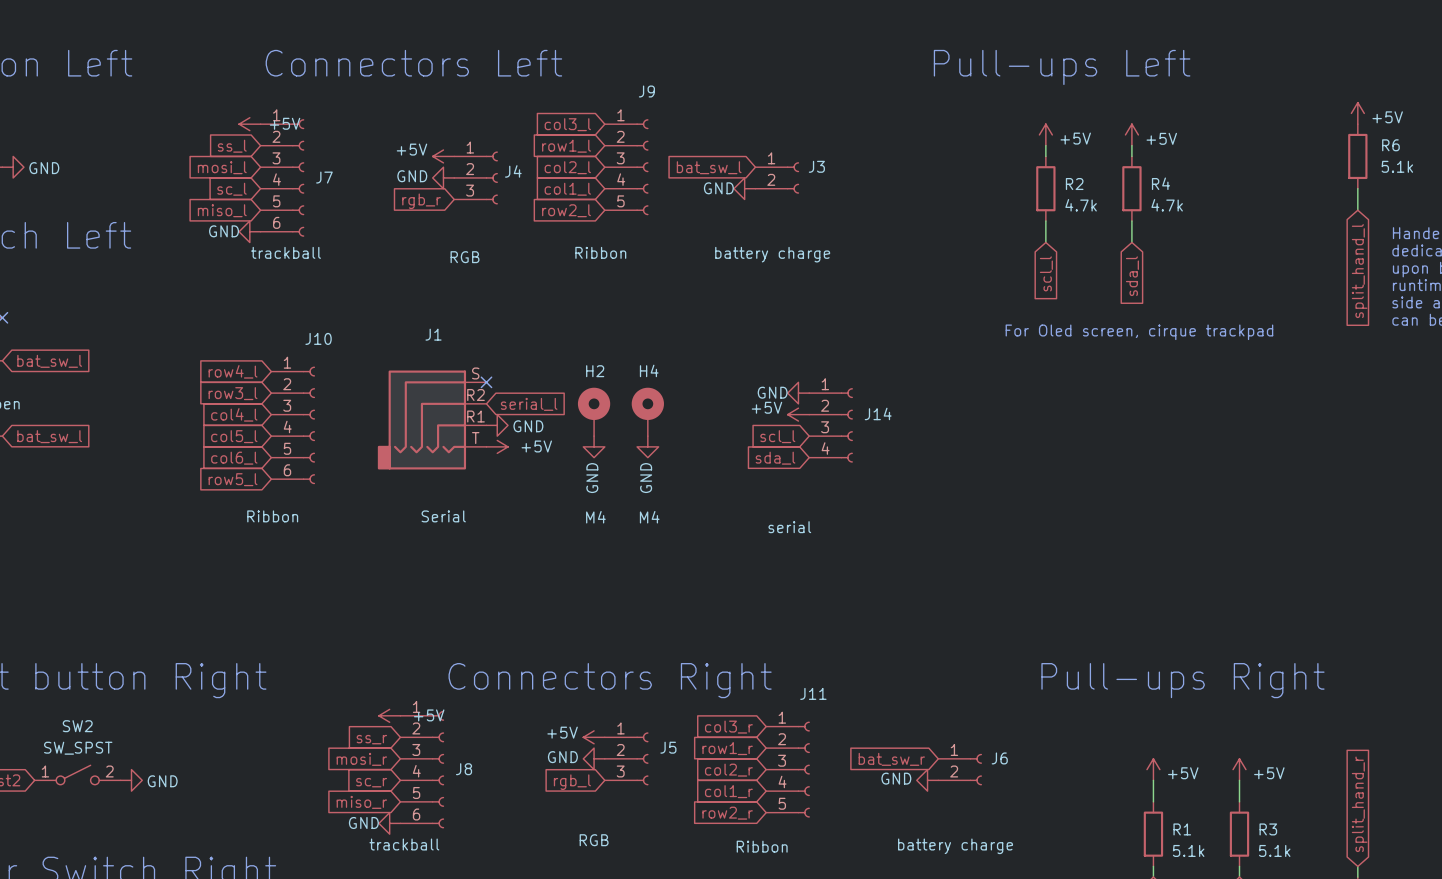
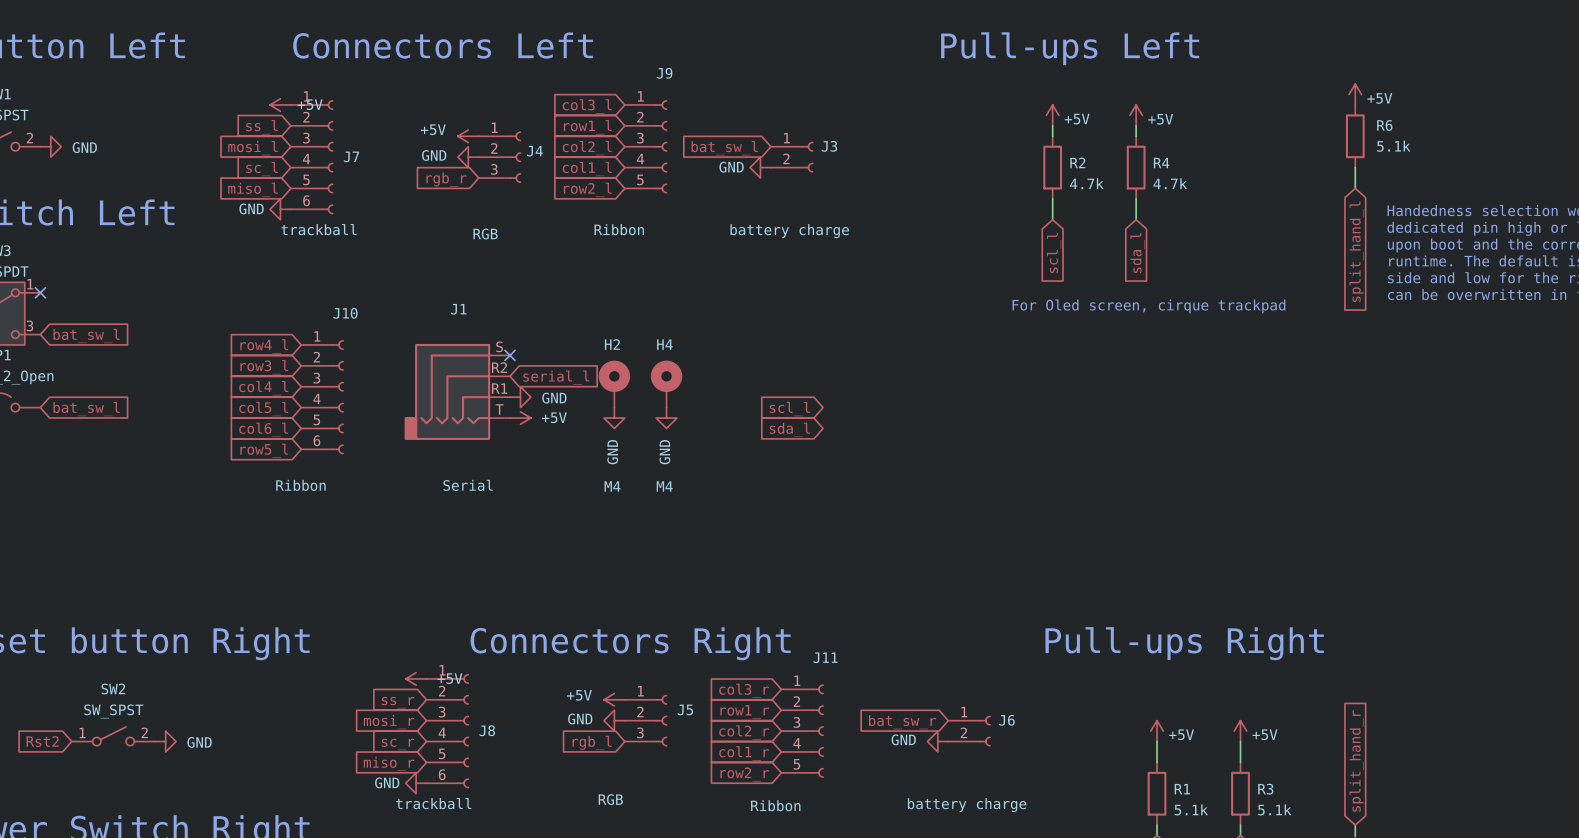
power symbol: GND (798, 393) -> none
power symbol: +5V (798, 414) -> none
J14: serial (831, 425) -> none

